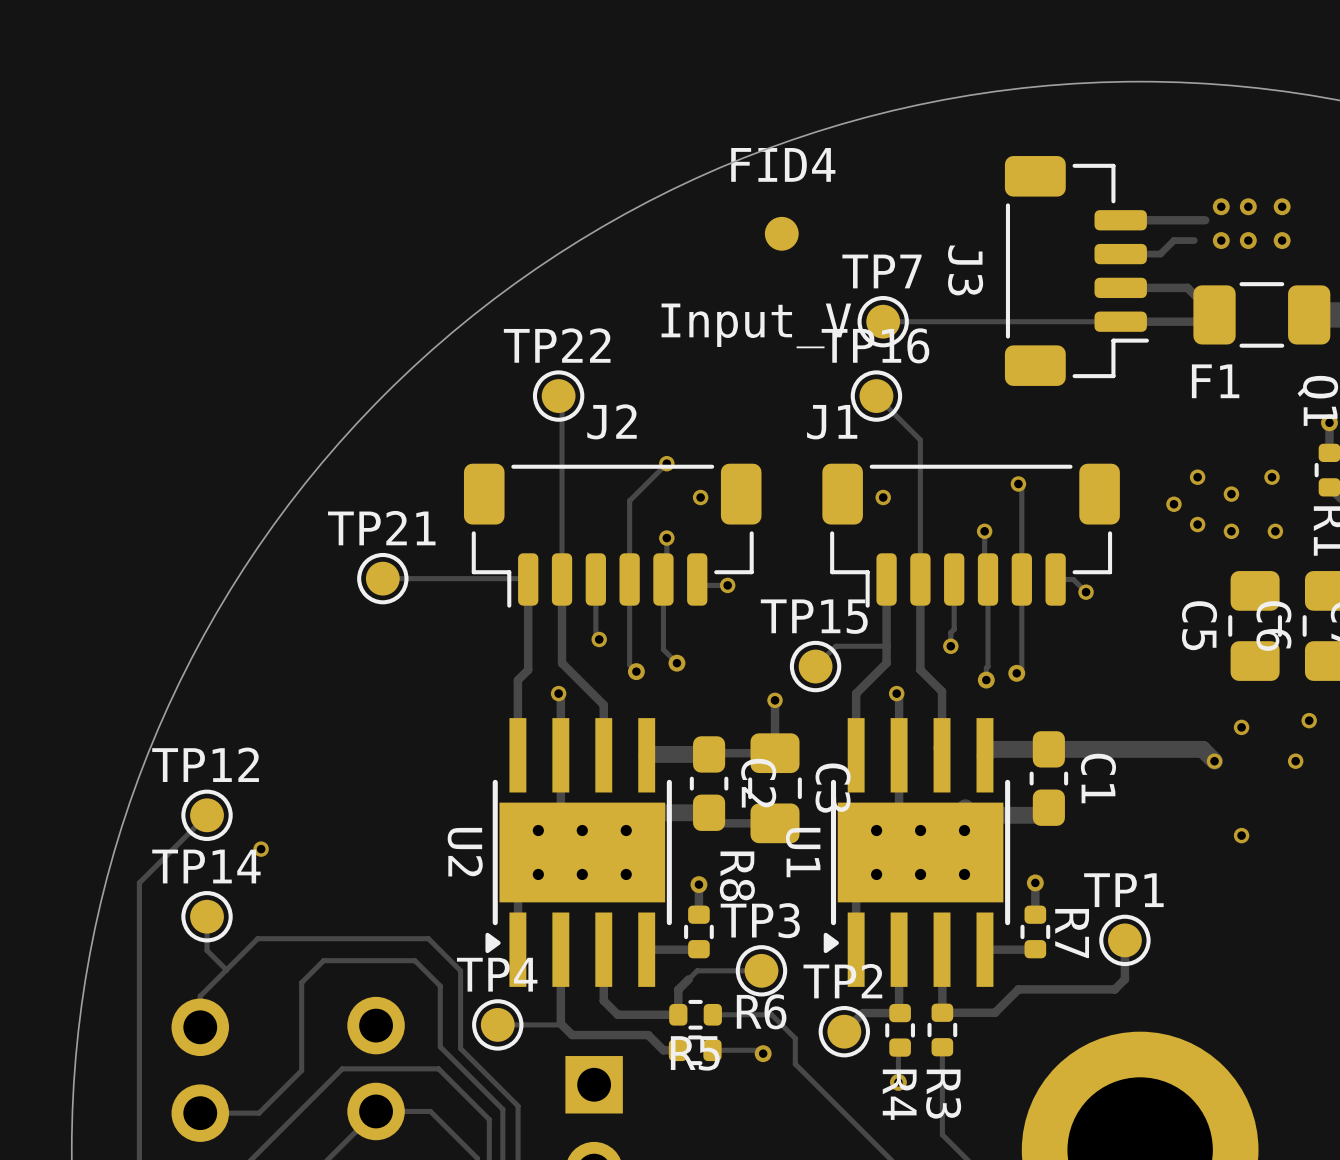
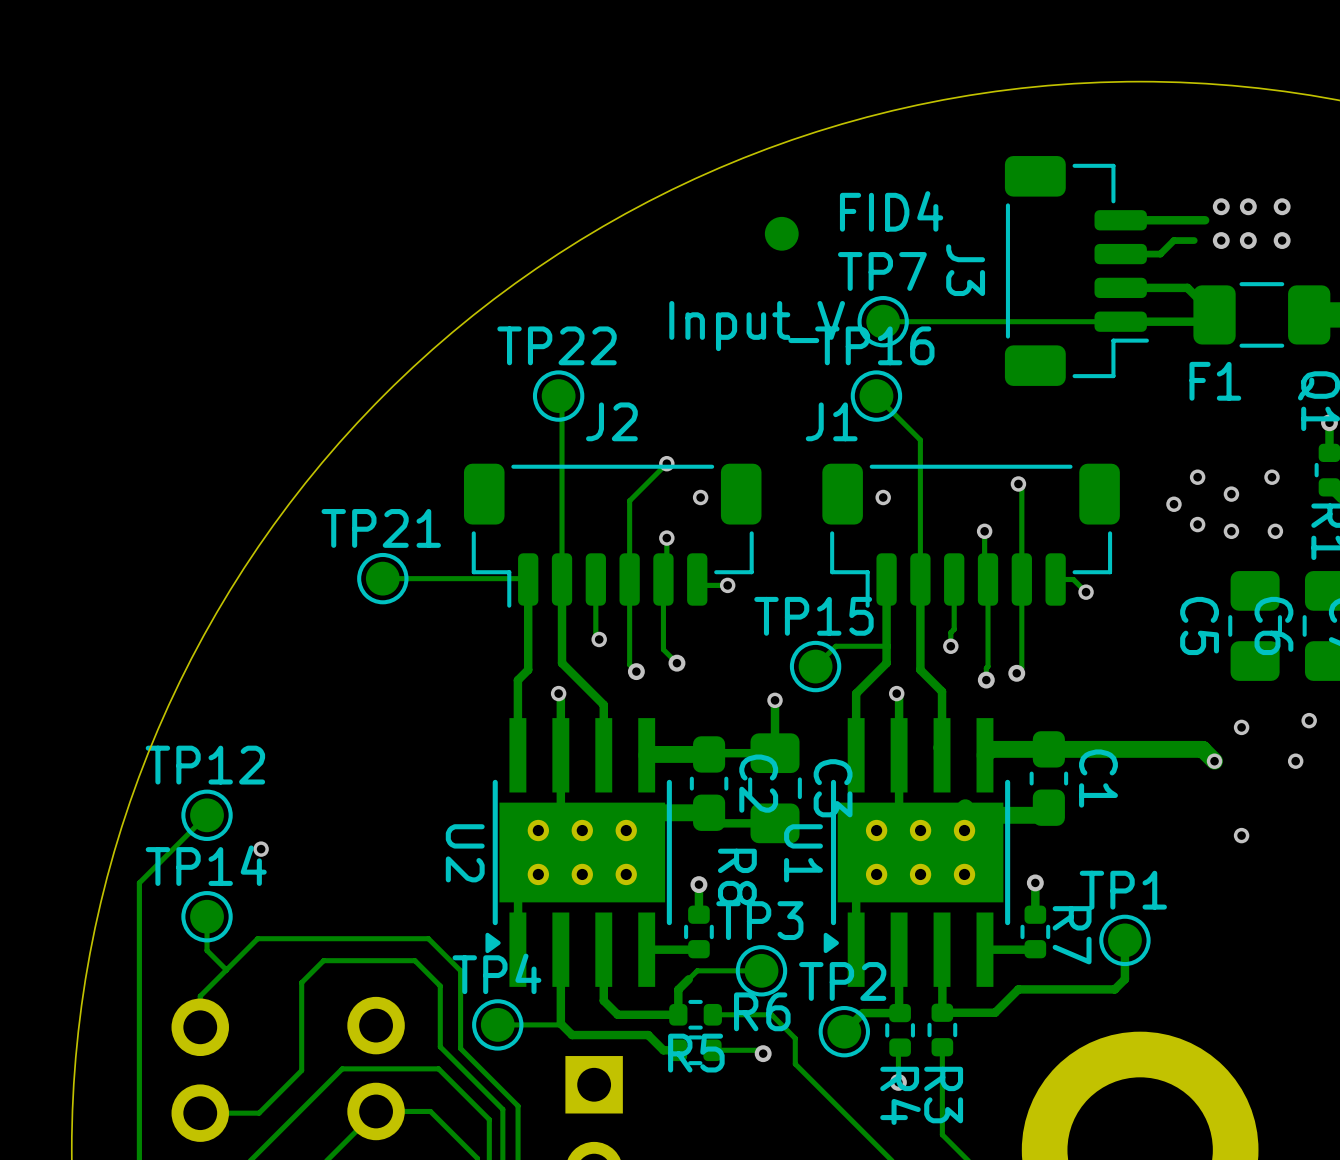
FID4 name position: FID4 (783, 164) -> FID4 (891, 211)

